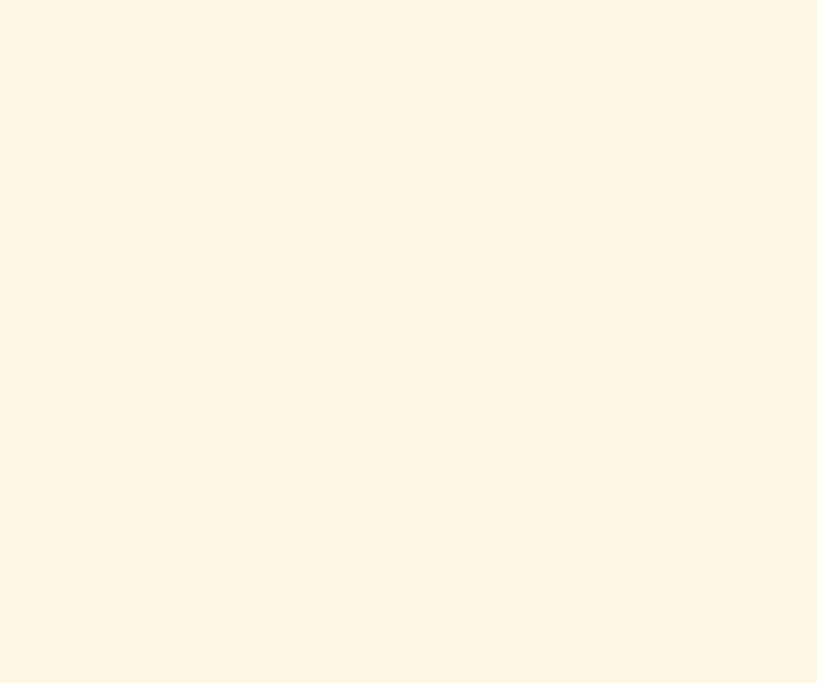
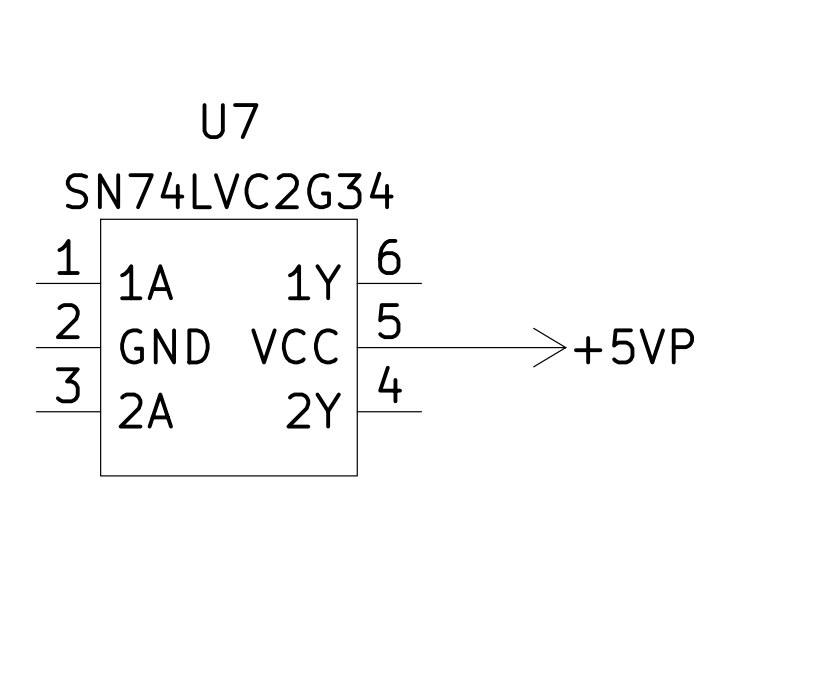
U7: none -> SN74LVC2G34 (228, 347)
wire: none -> (421, 347) (501, 347)
power symbol: none -> +5VP (533, 347)

